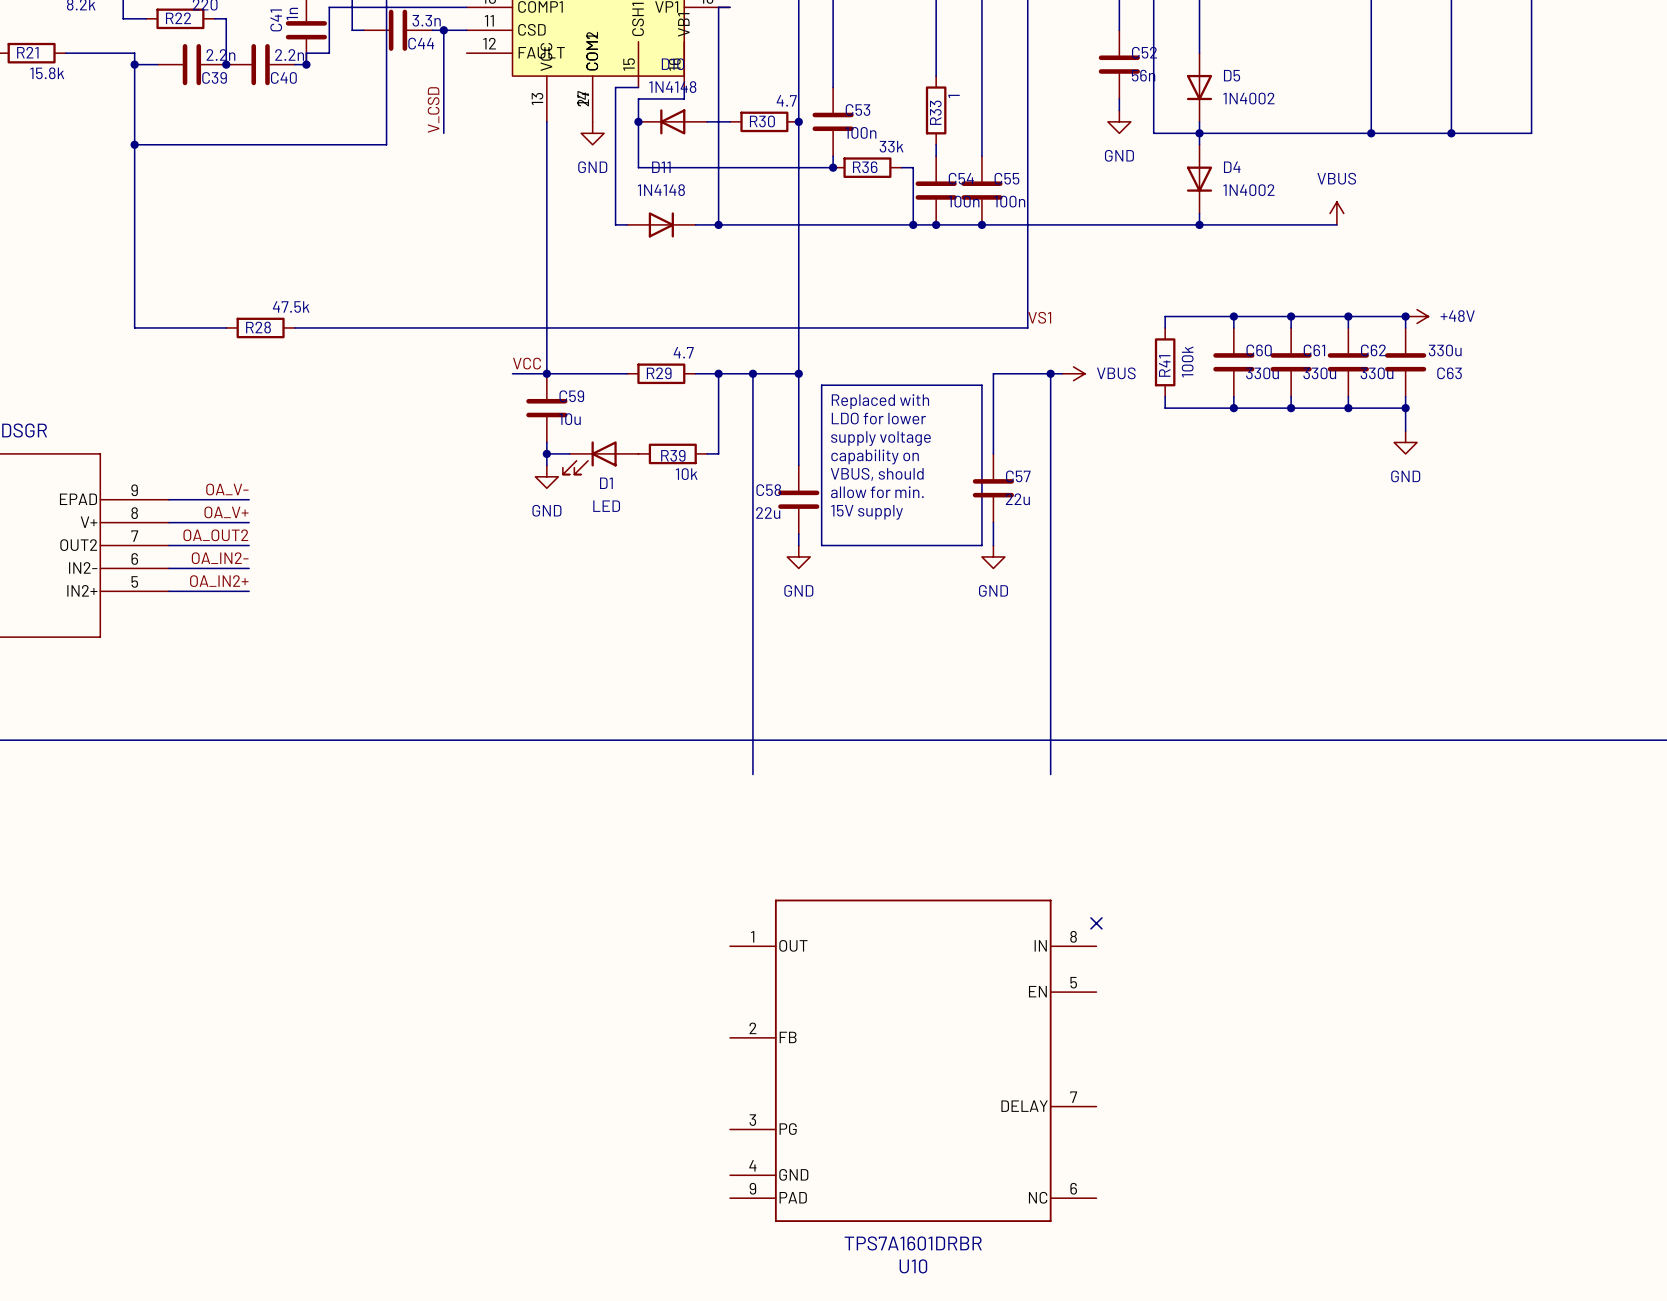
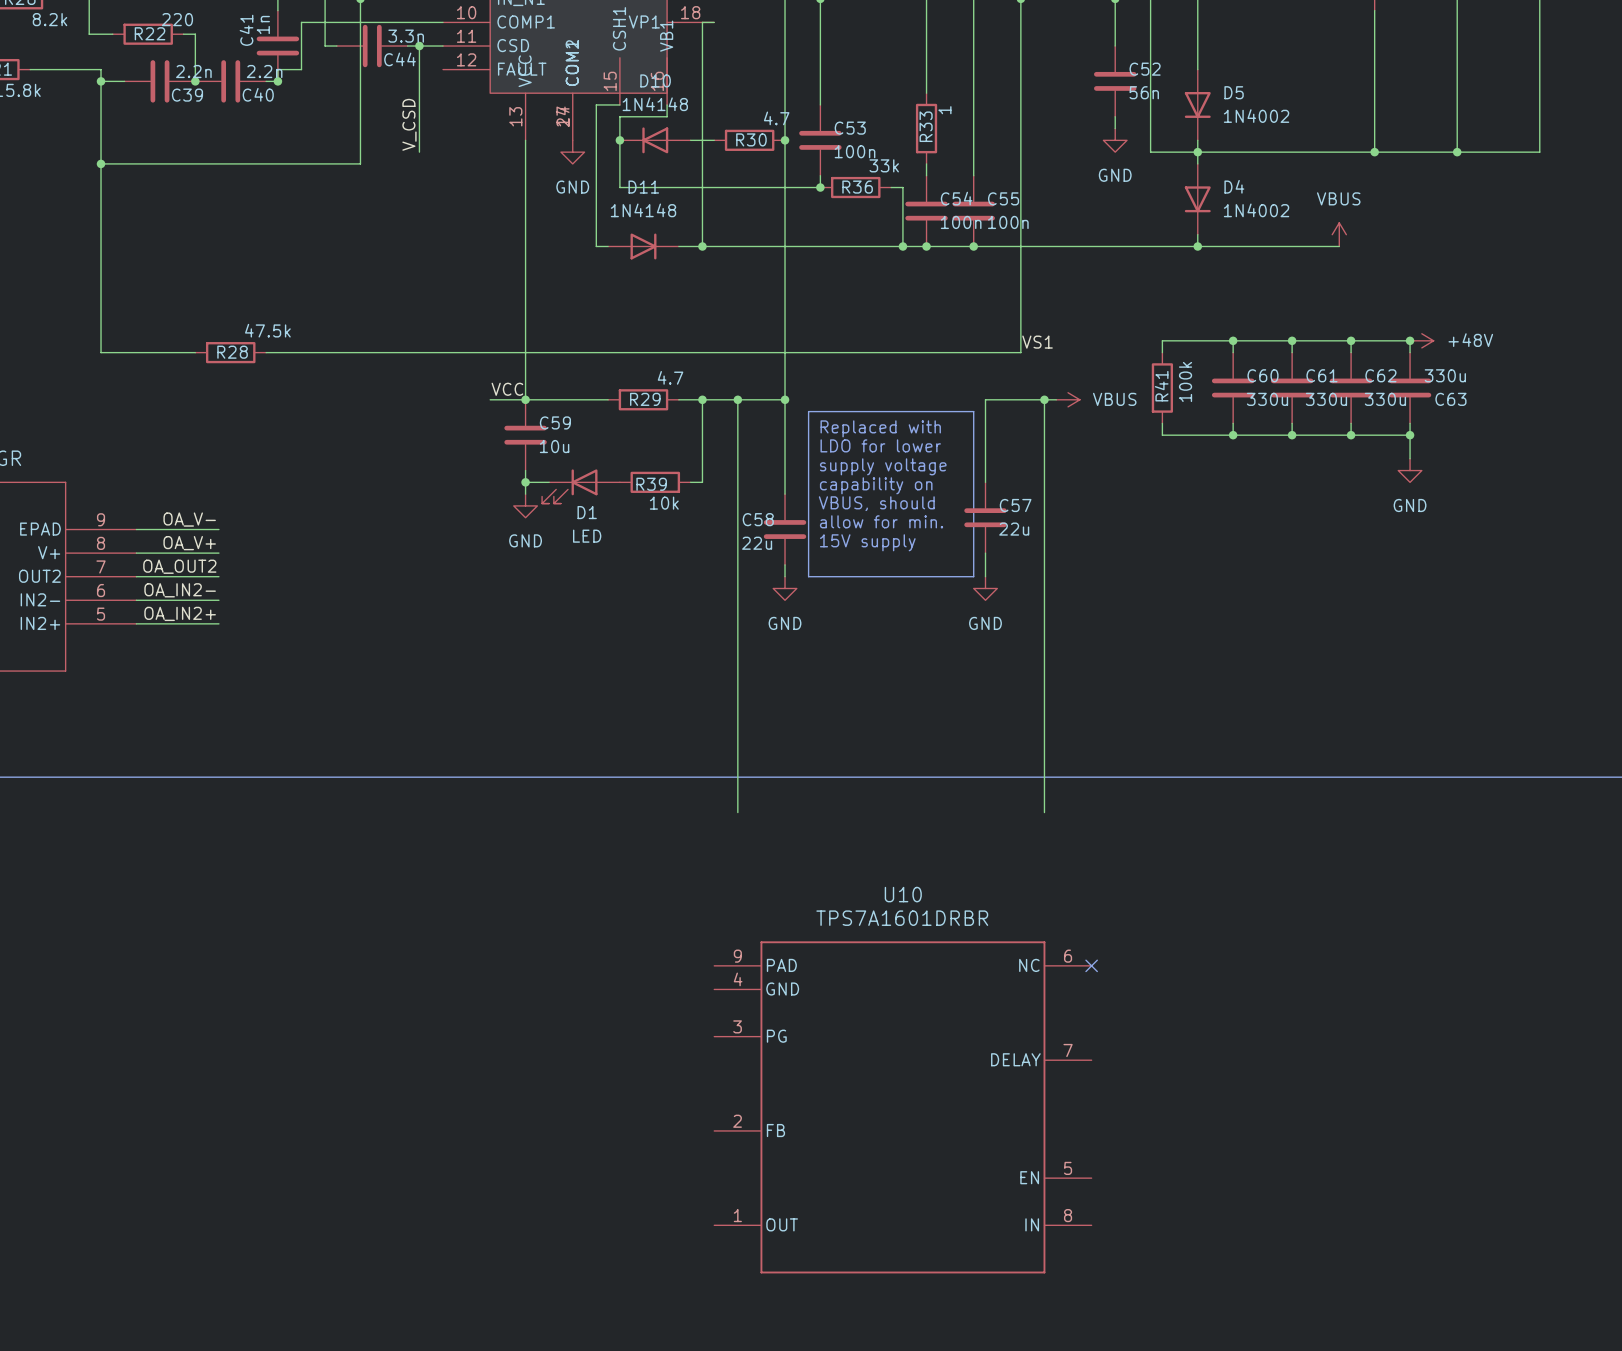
U10 flip: as is (913, 1060) -> up-down (902, 1107)

